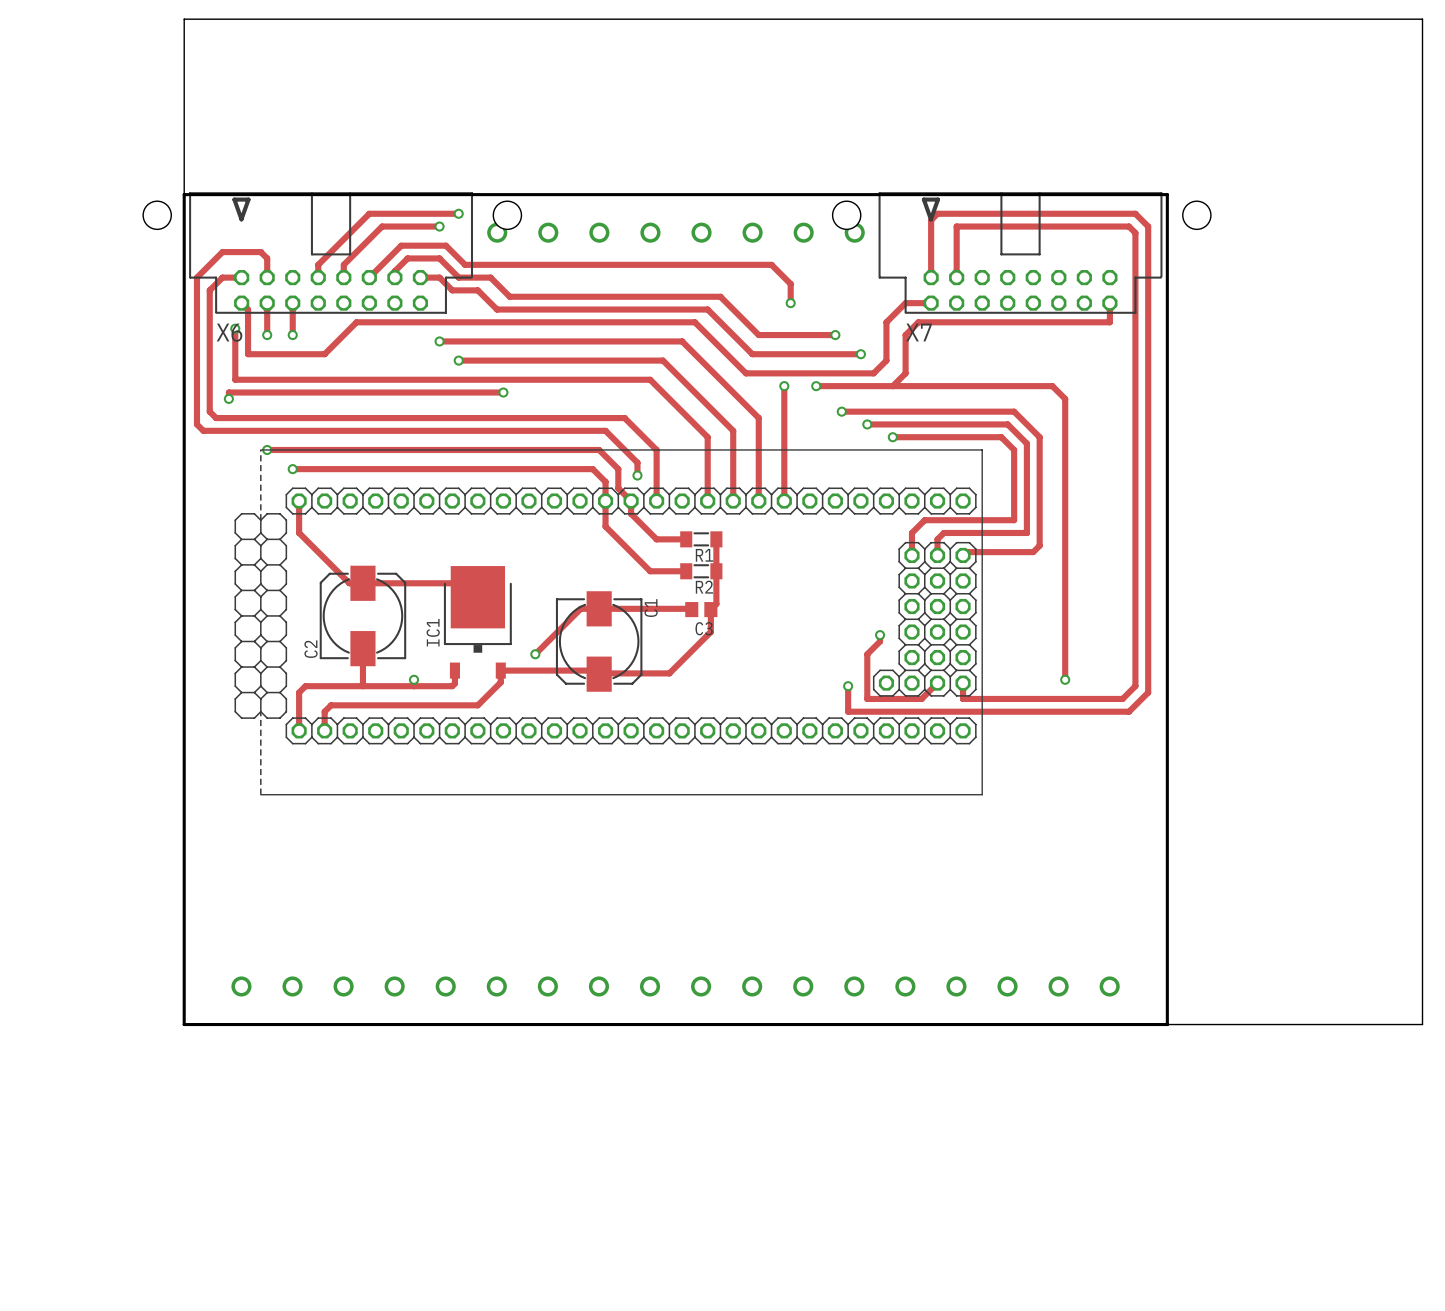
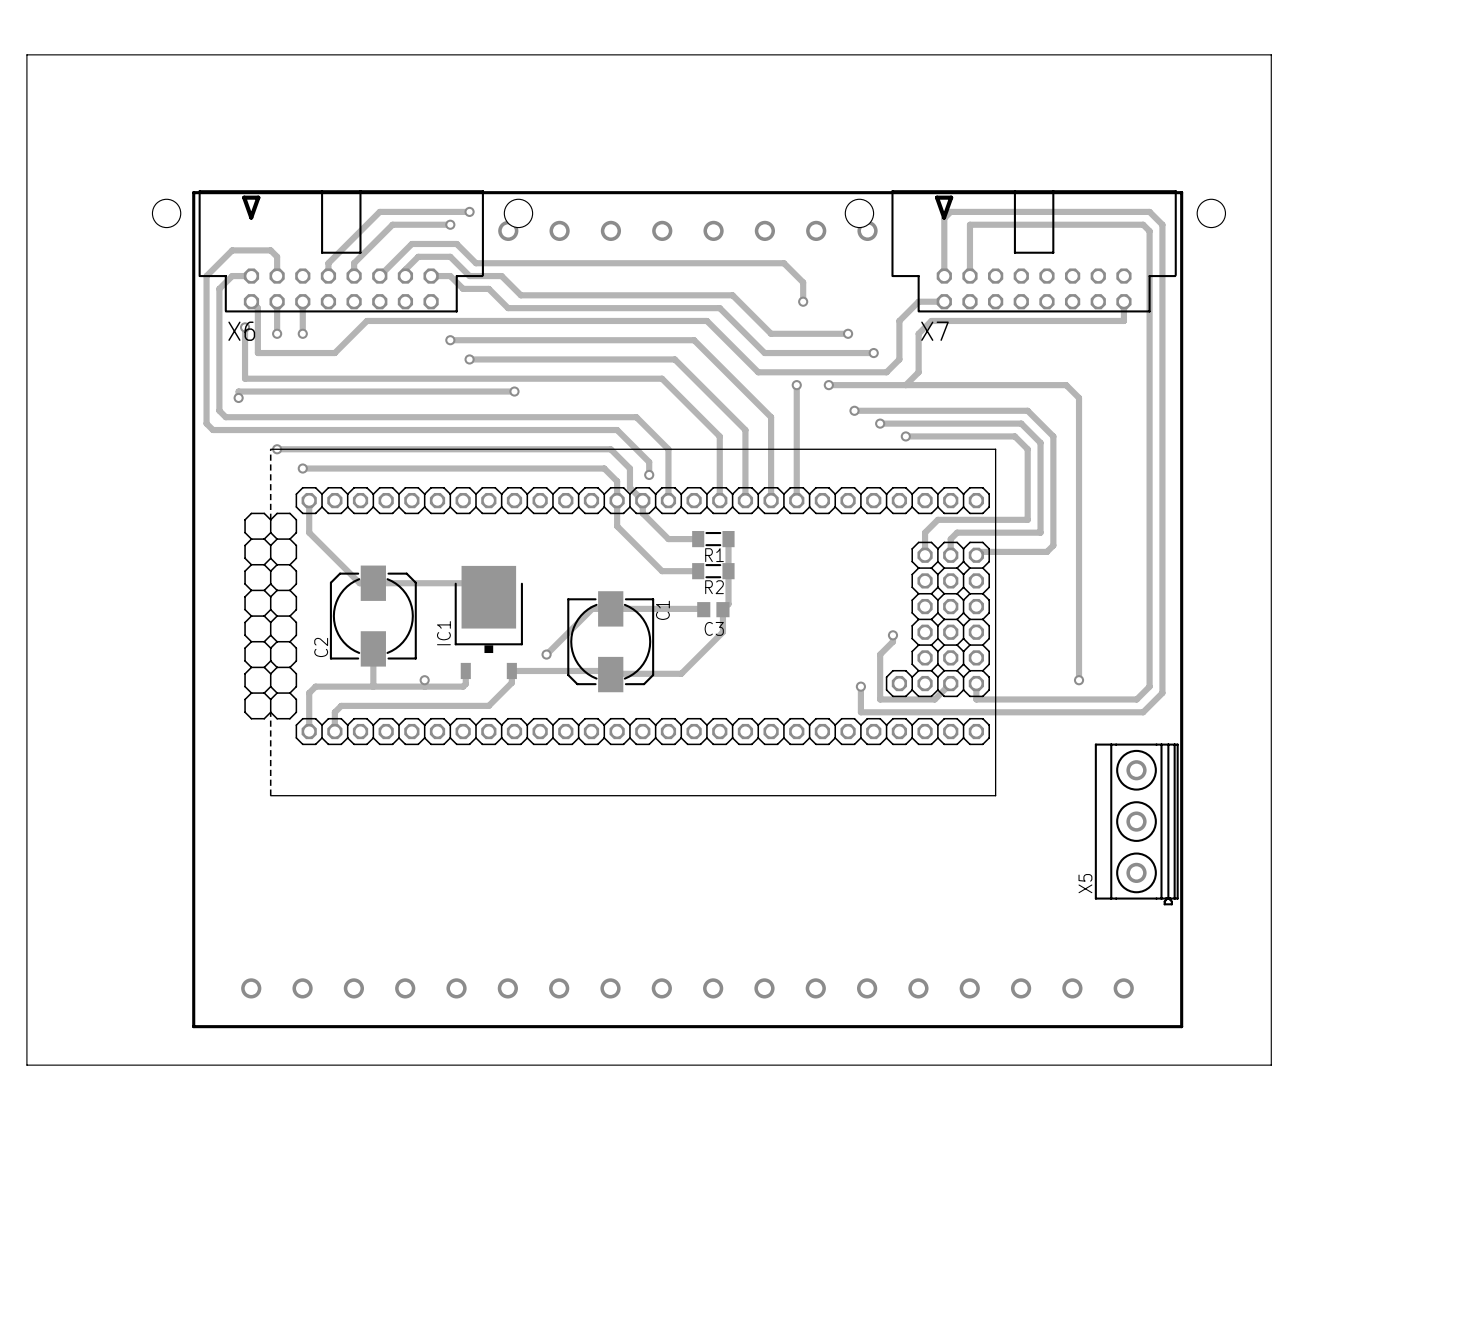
board edge: (184, 19) (1422, 19) (1422, 1024) (184, 1024) (184, 19) -> (26, 54) (26, 1065) (1271, 1065) (1271, 54) (26, 54)
X5: none -> (1136, 824)

